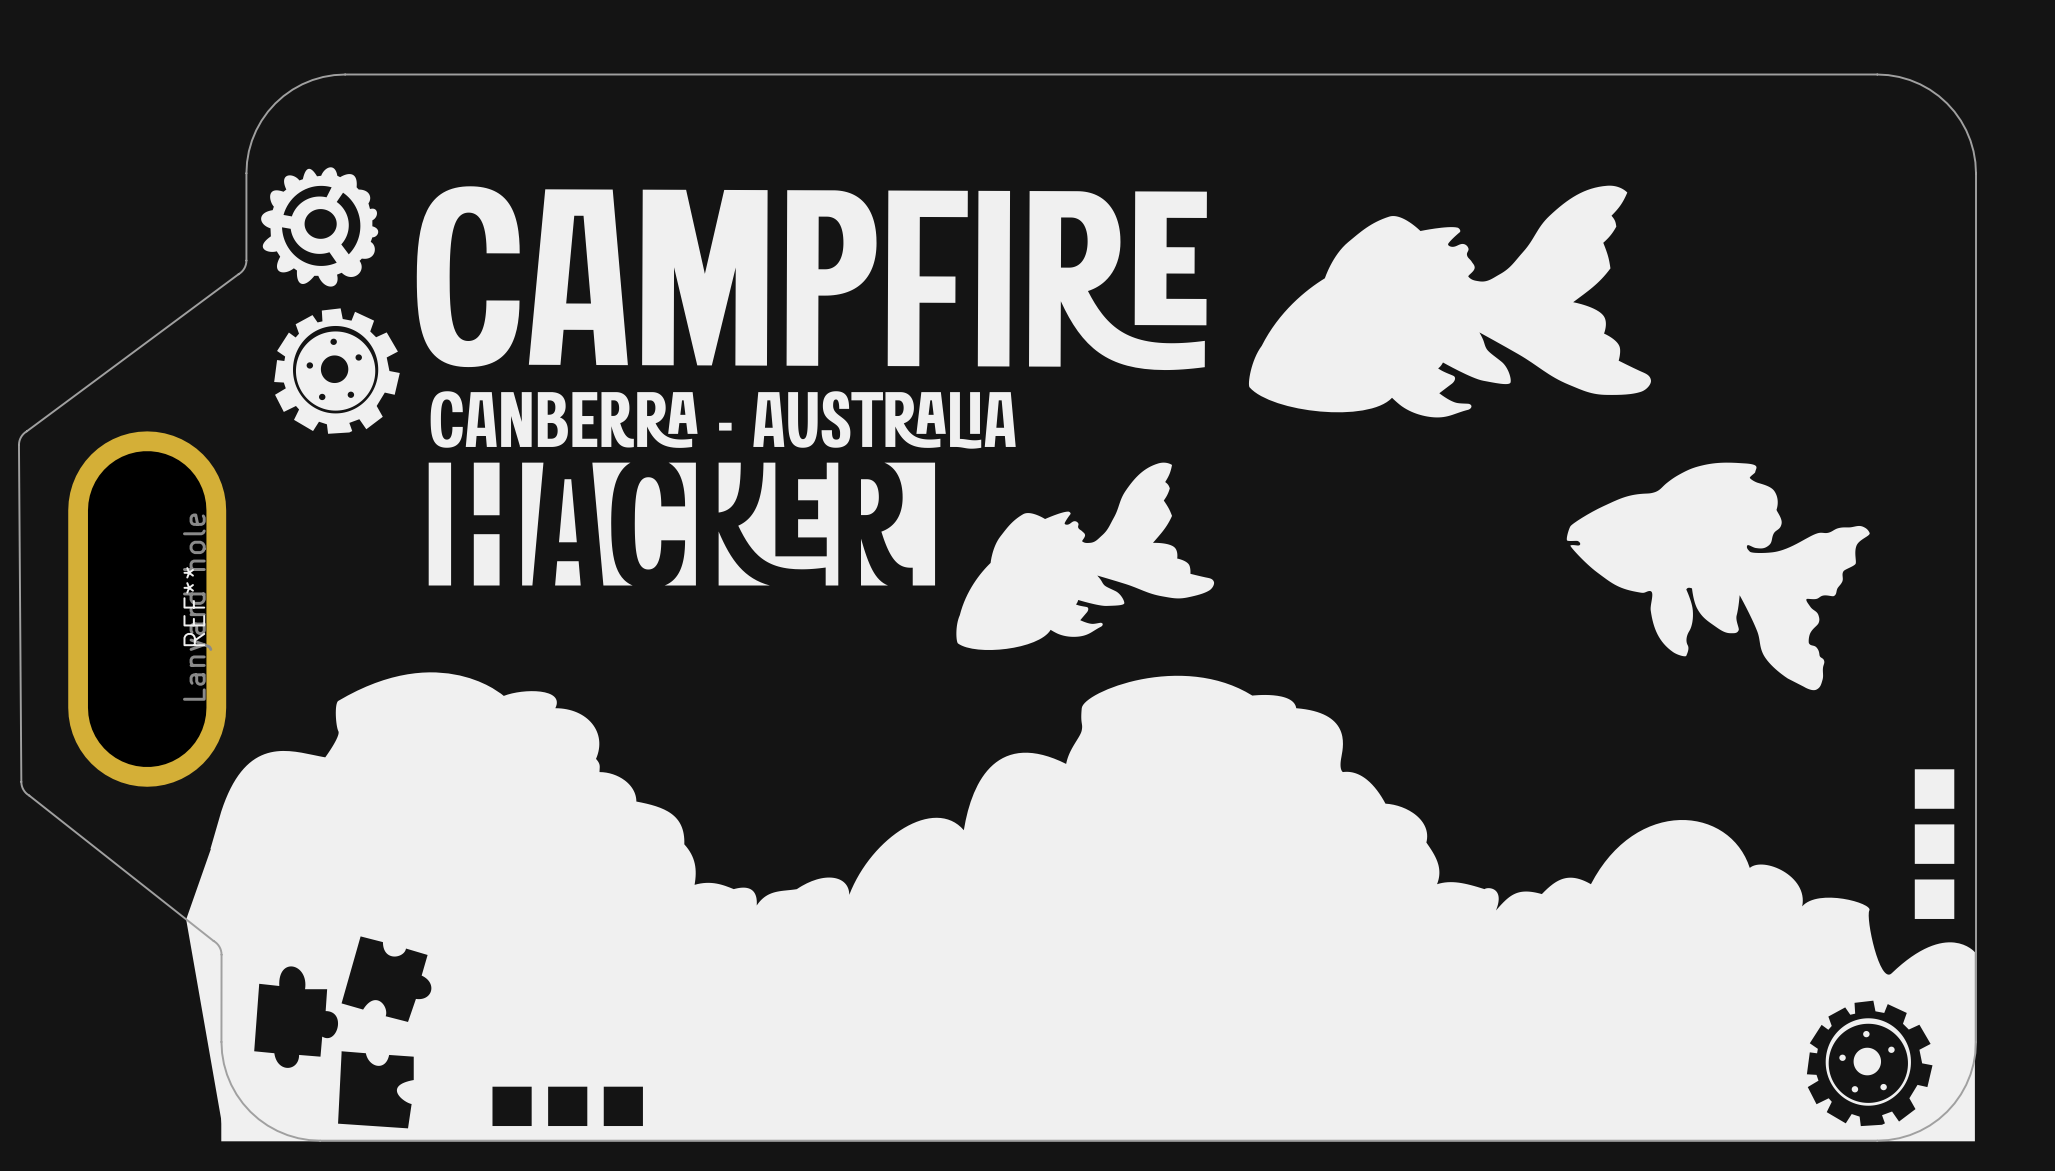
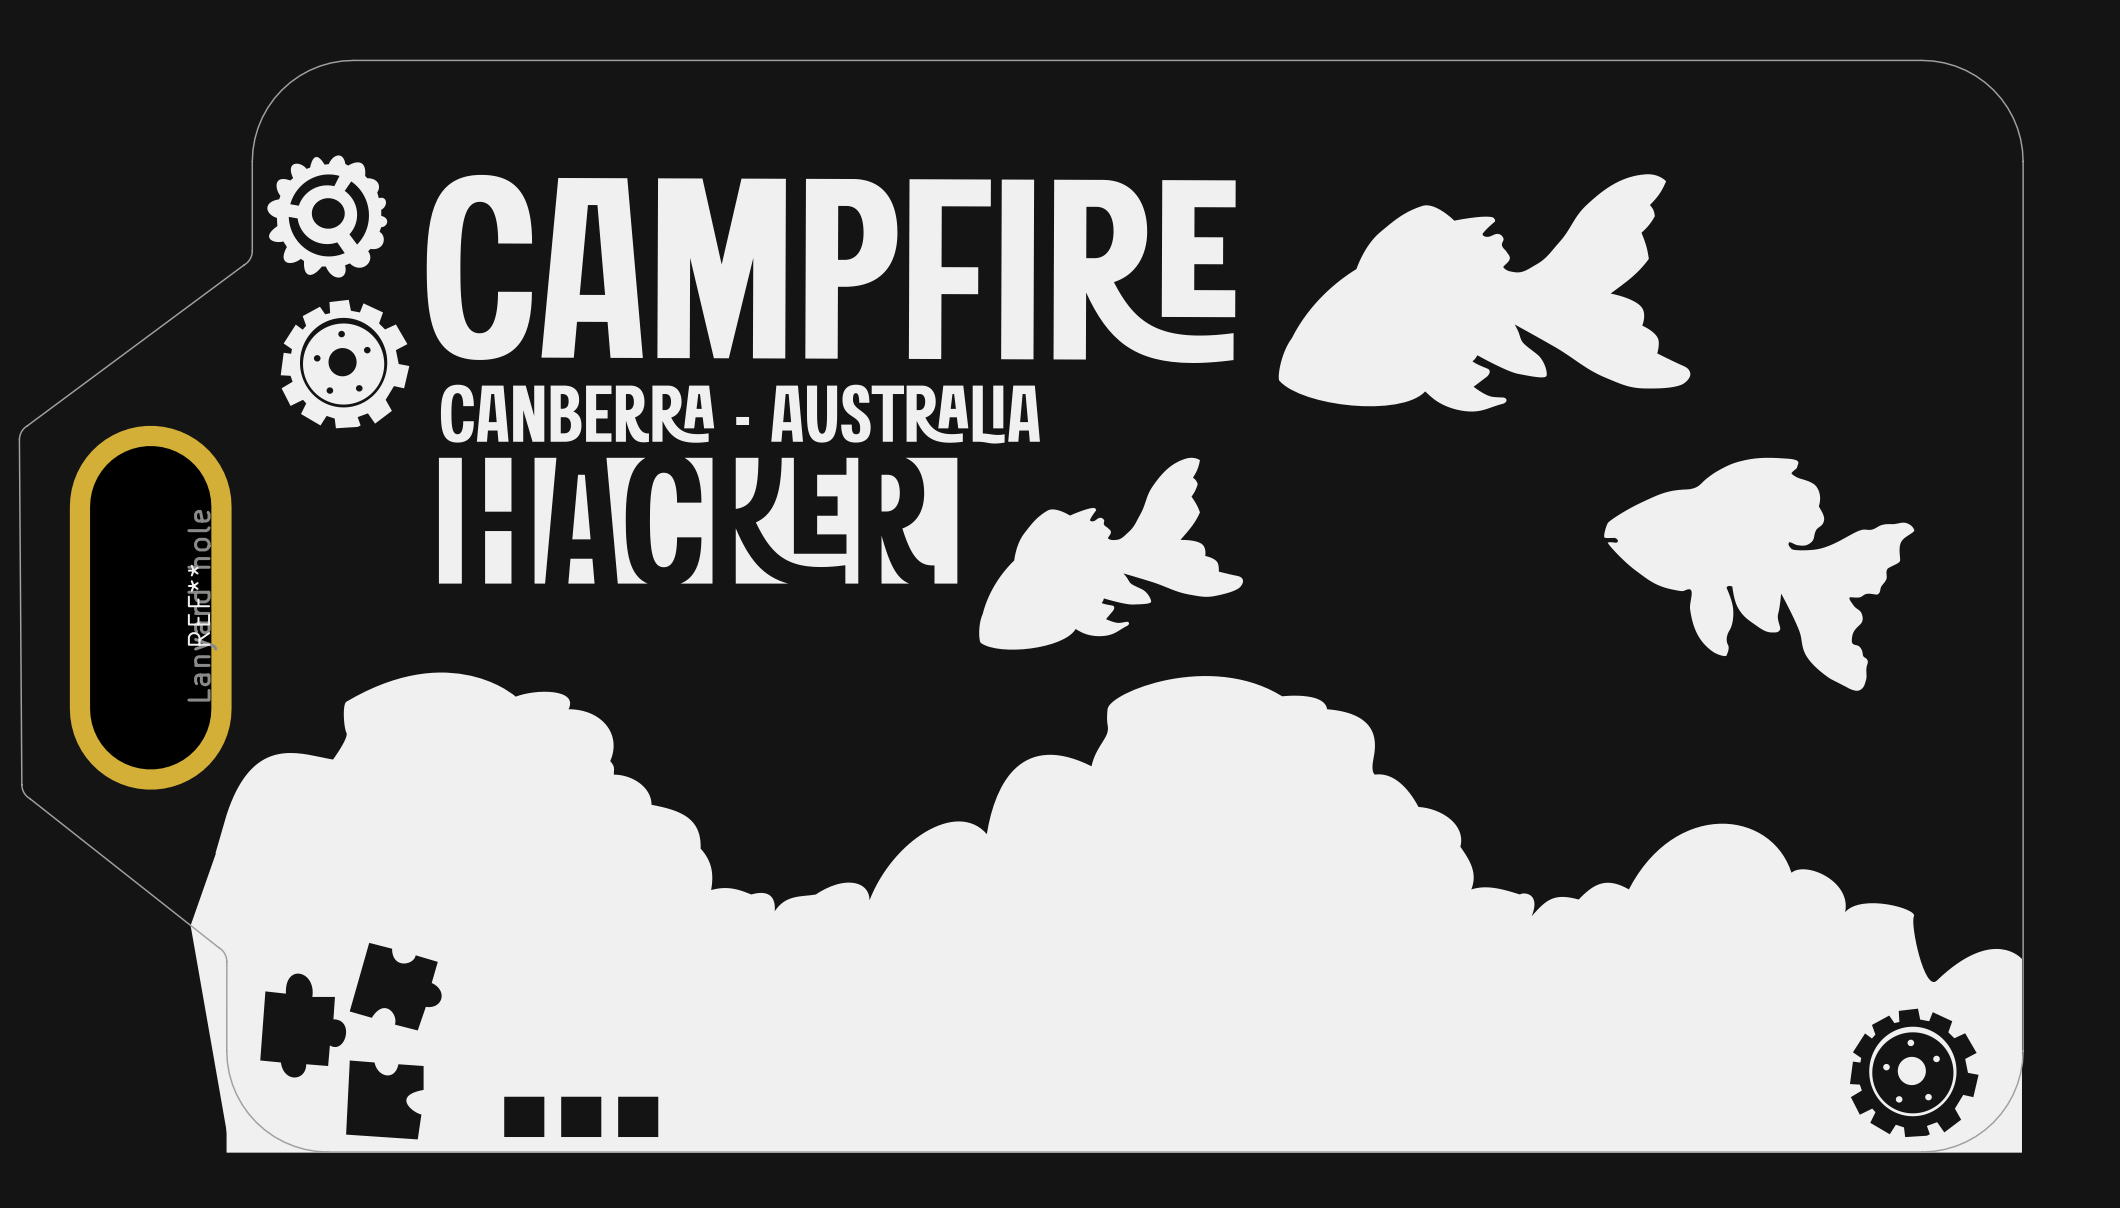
drawing: [1914, 769, 1955, 919] -> none

